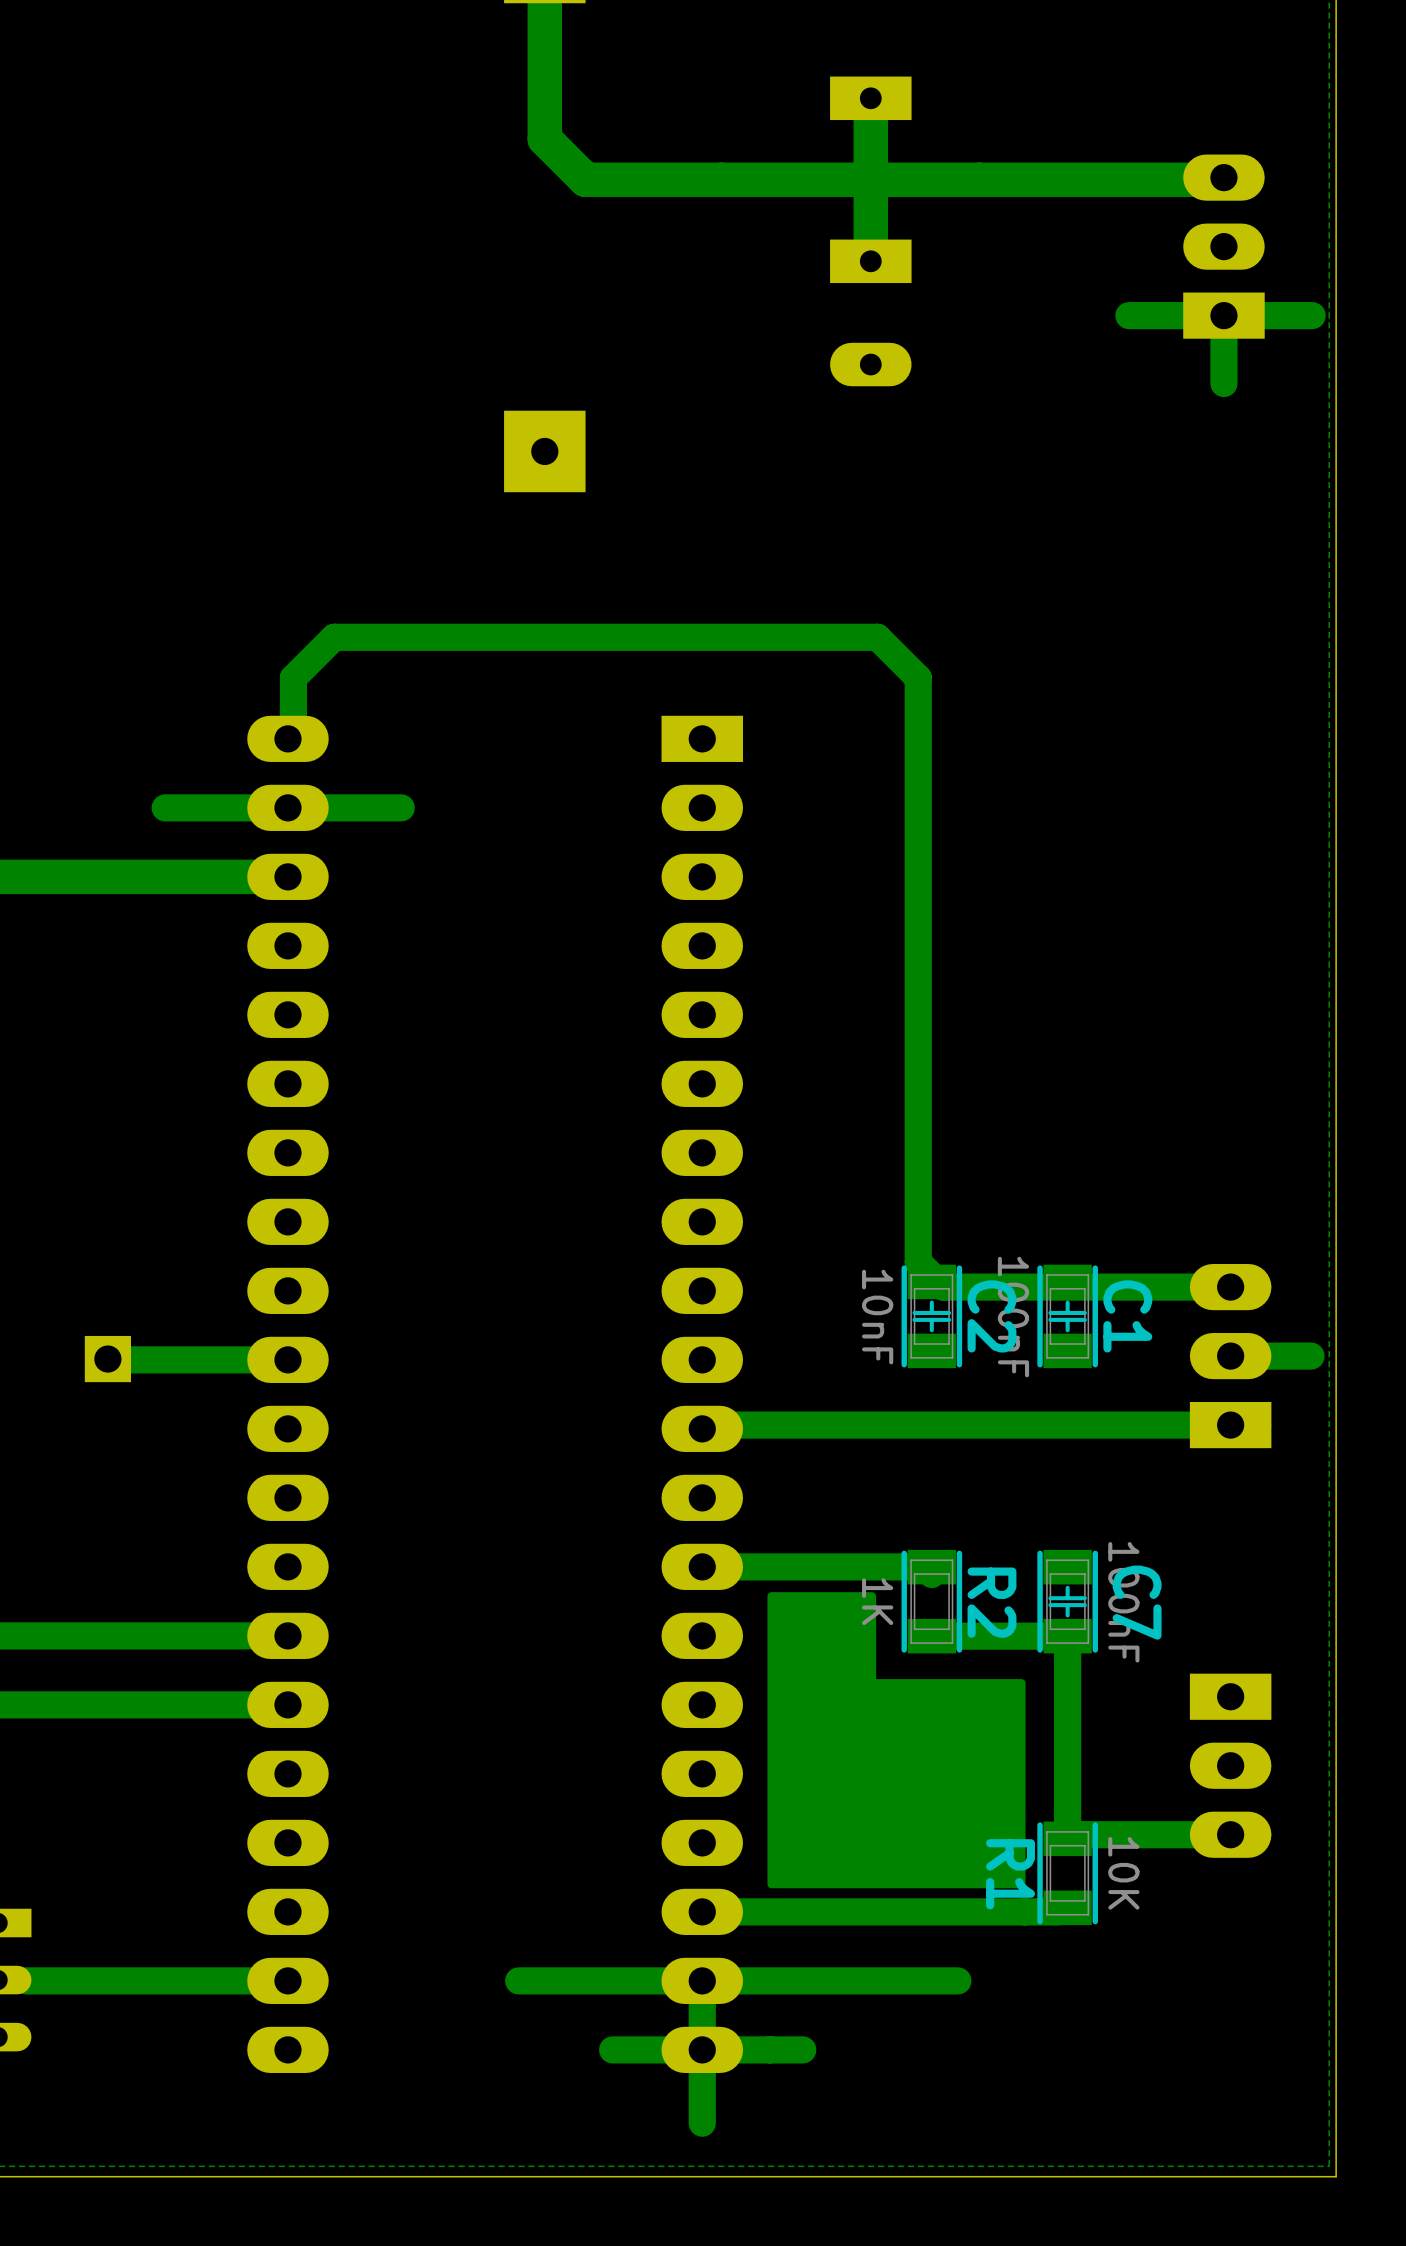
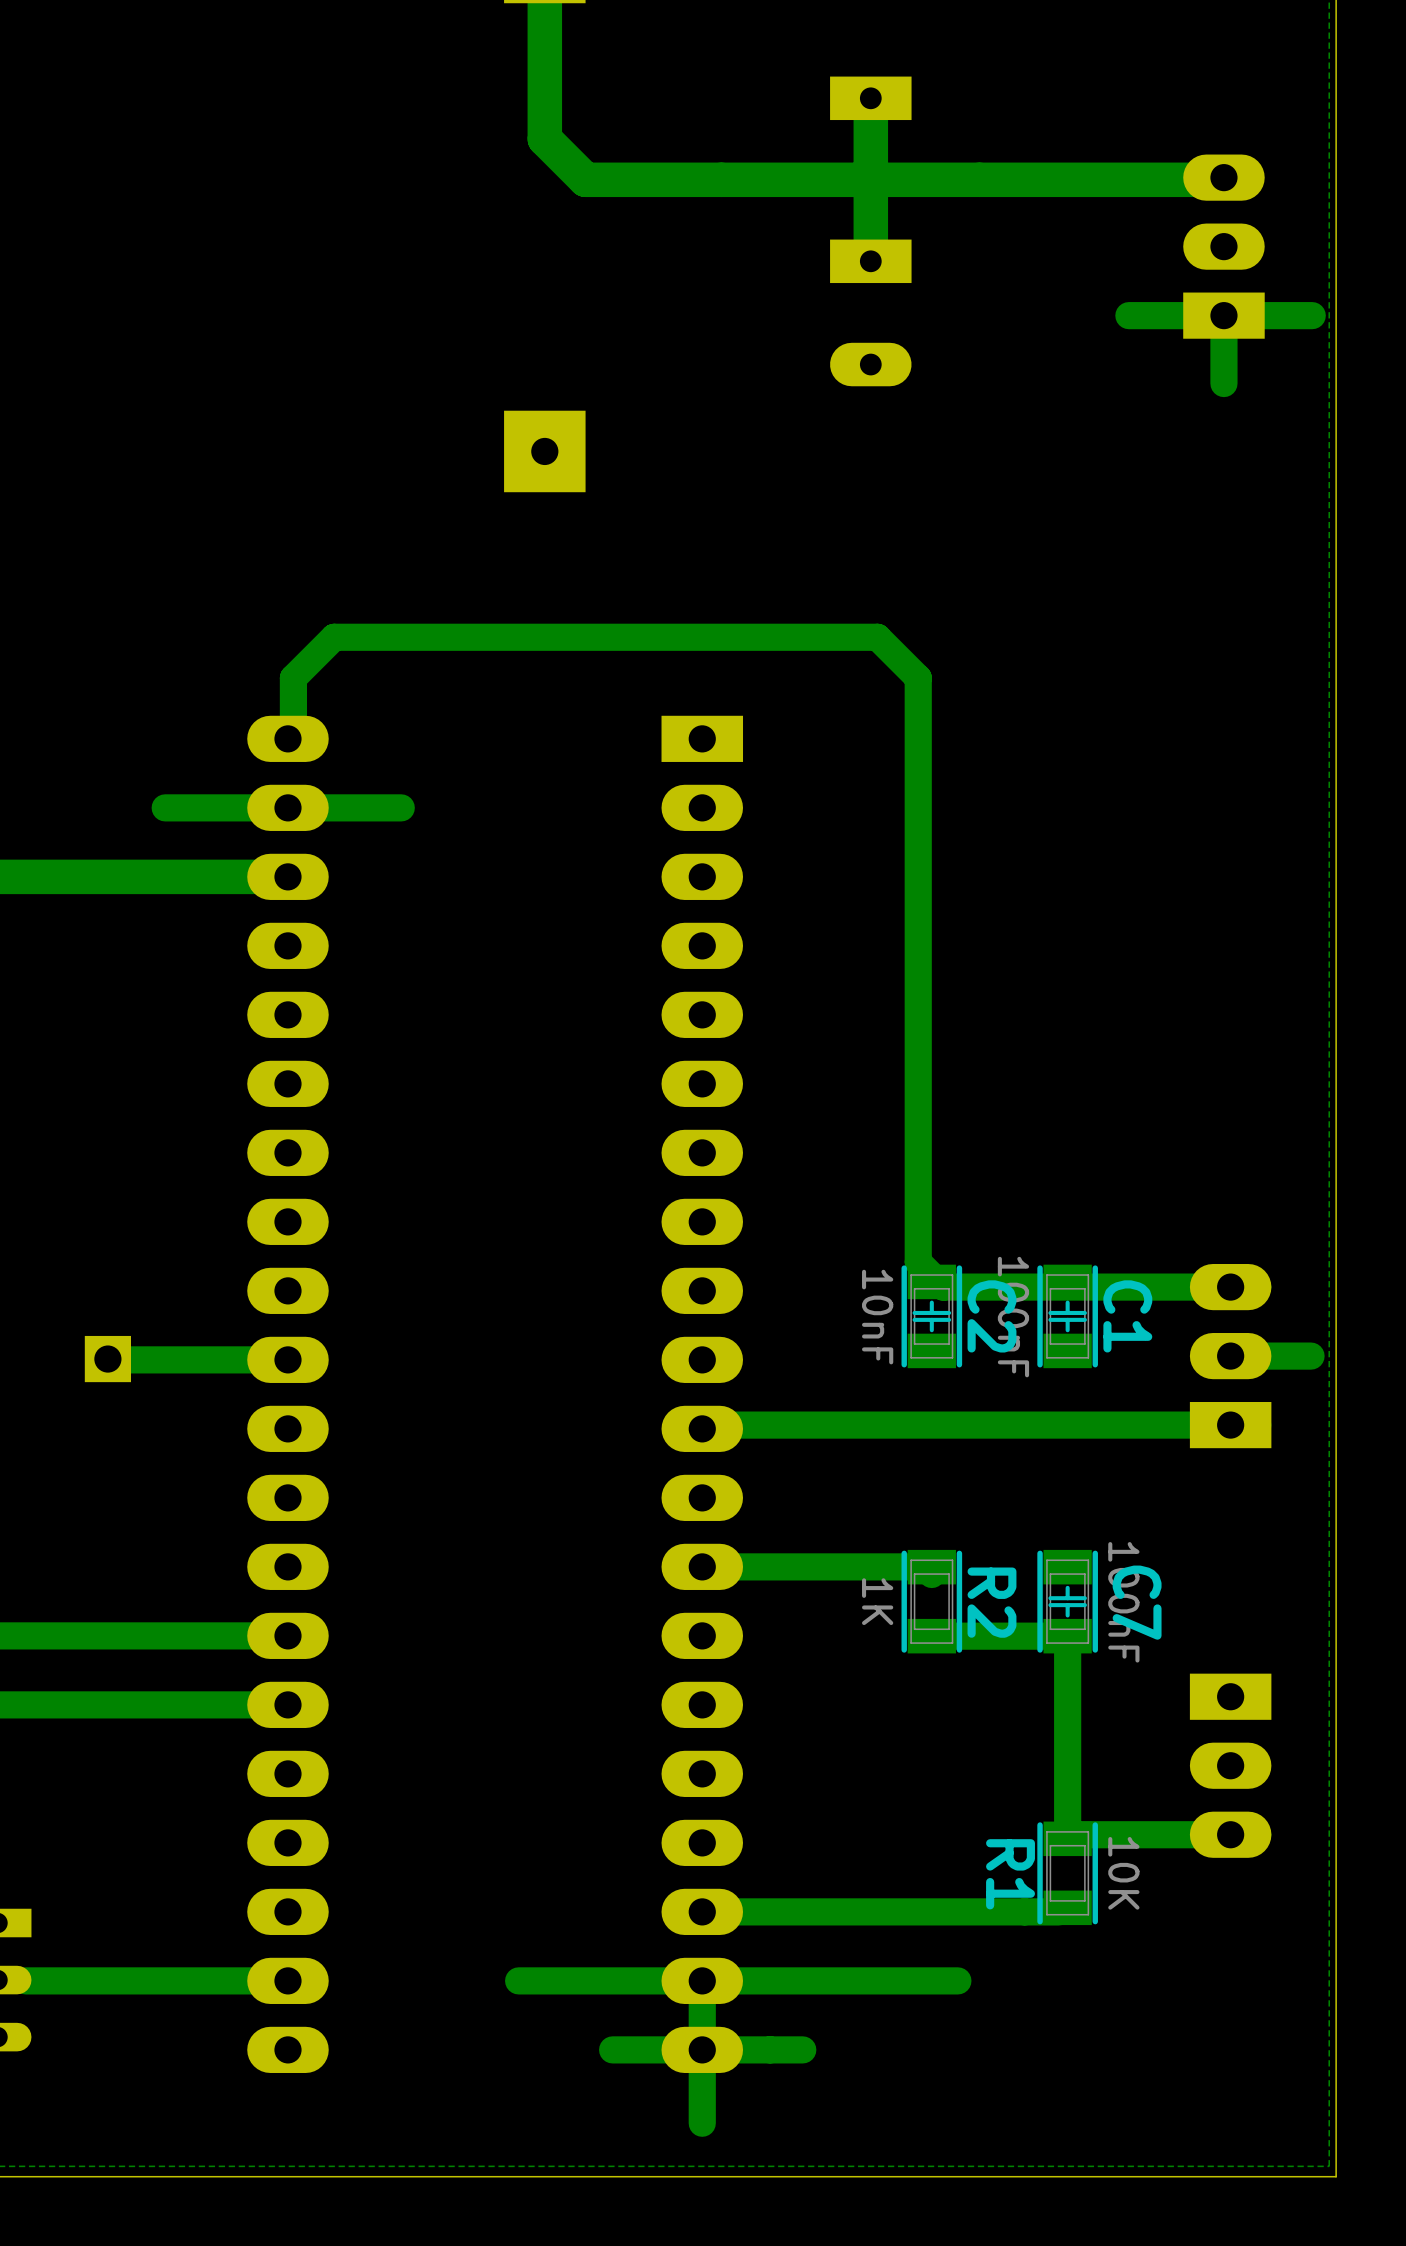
drawing: [767, 1592, 1026, 1889] -> none

